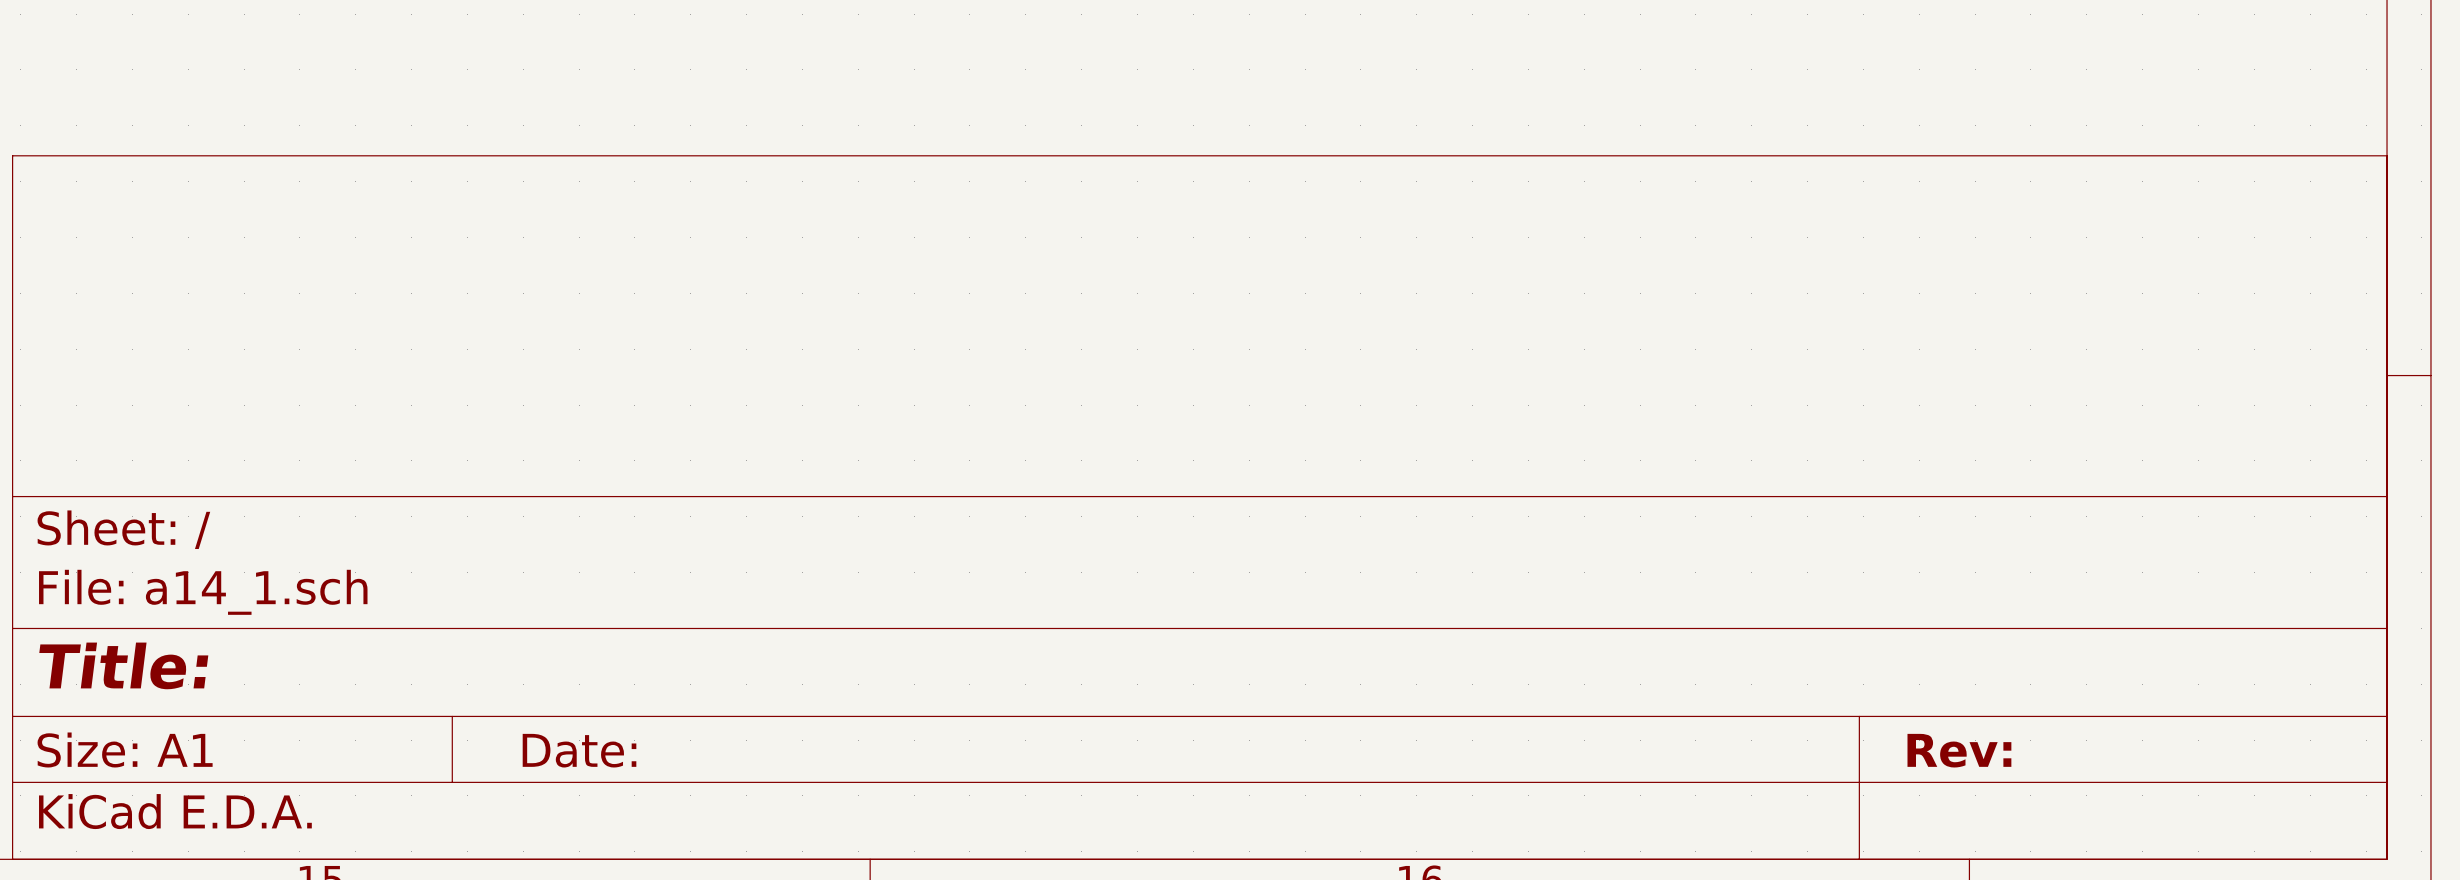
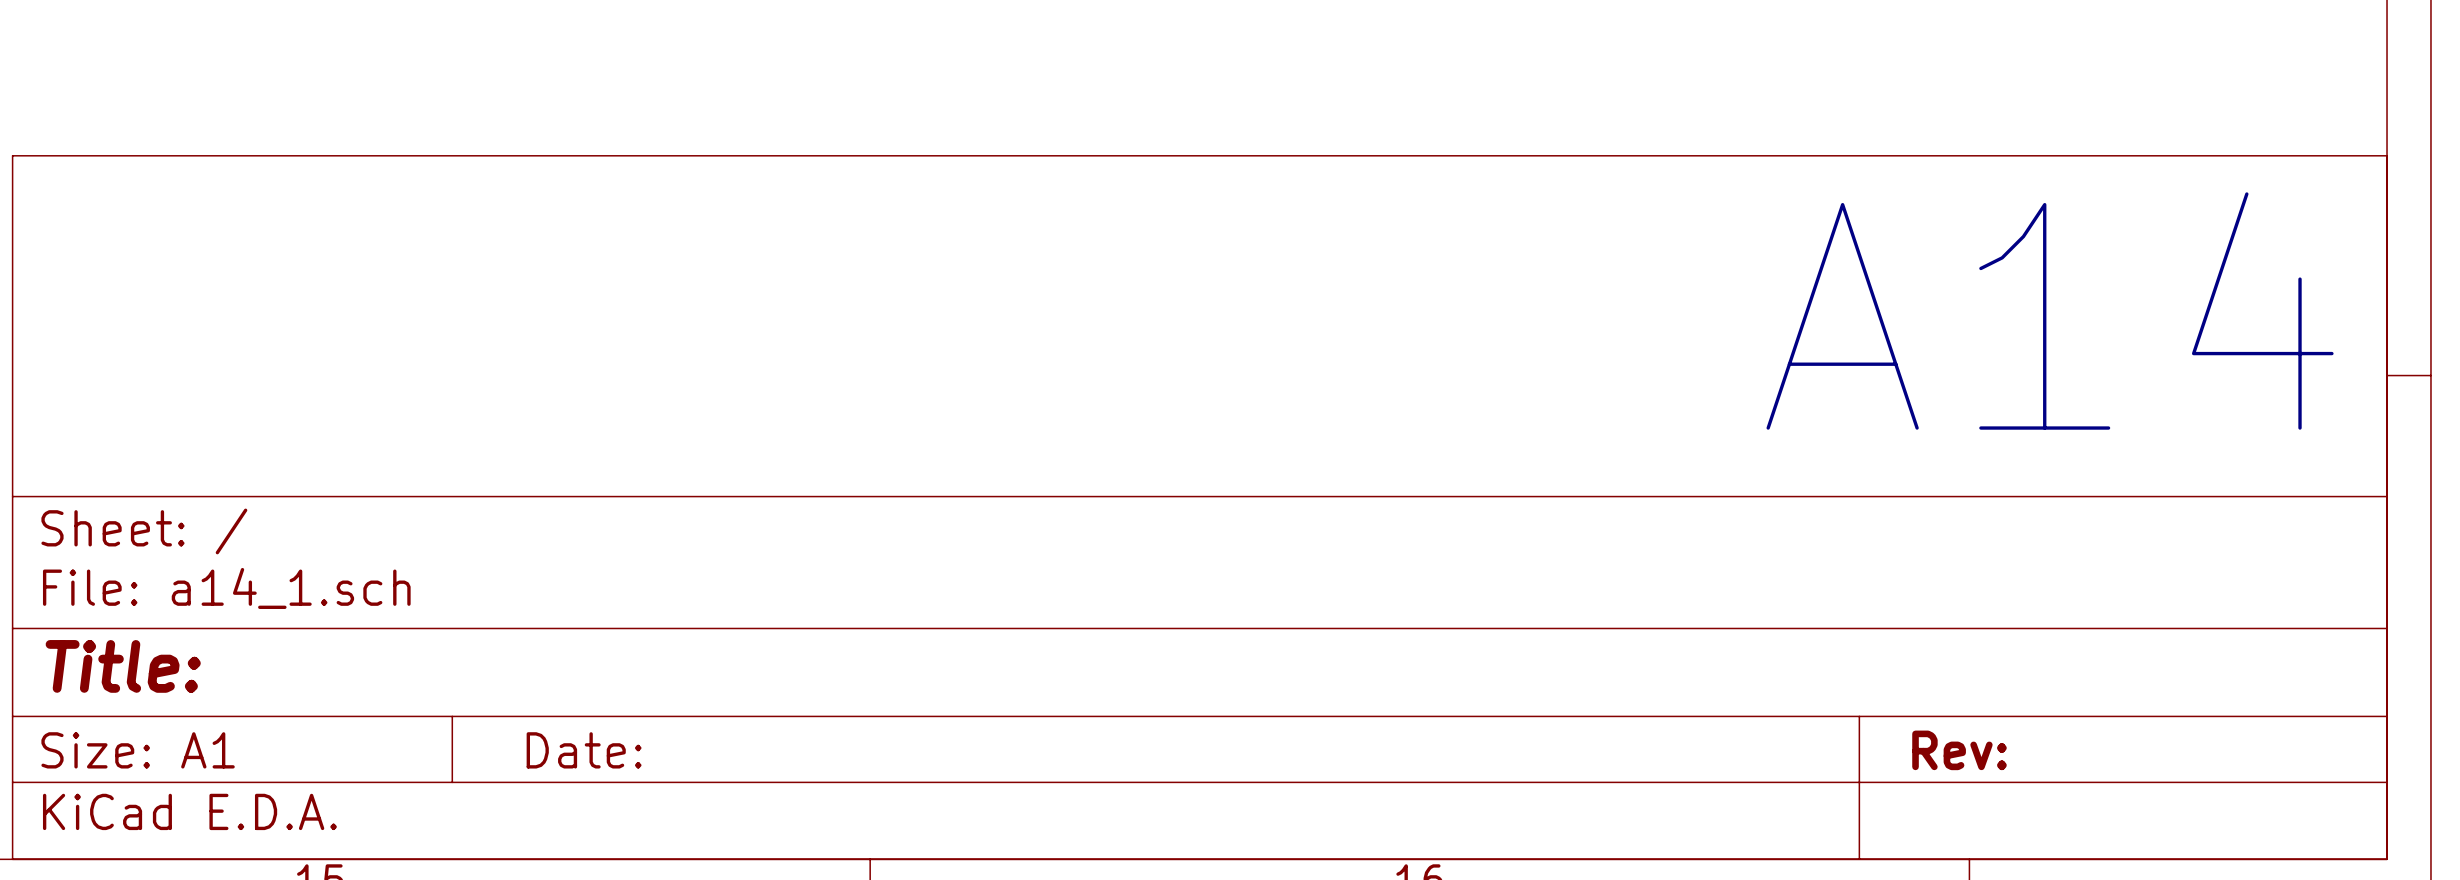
text: none -> A14 (2050, 311)

